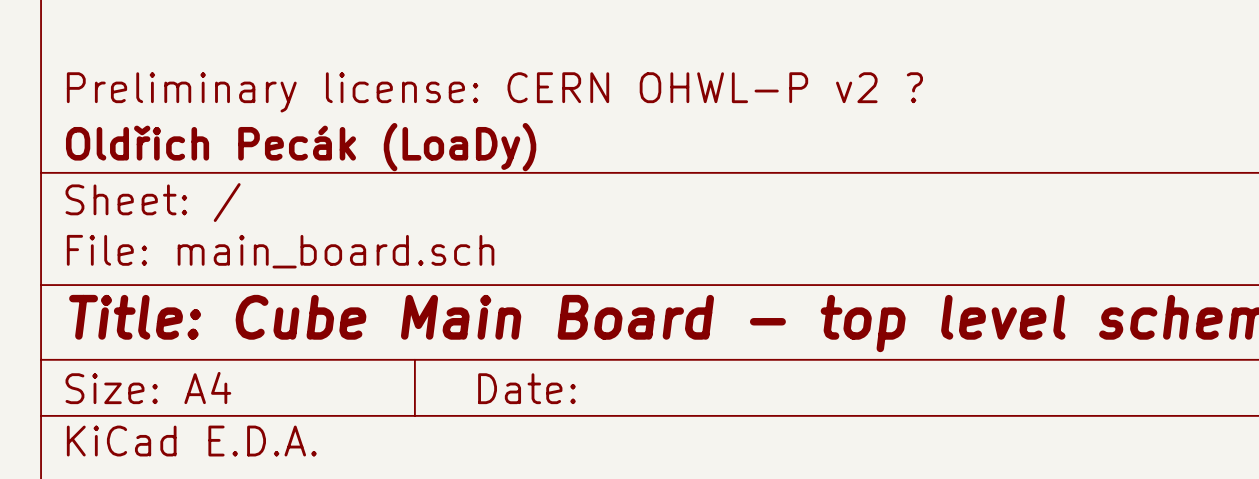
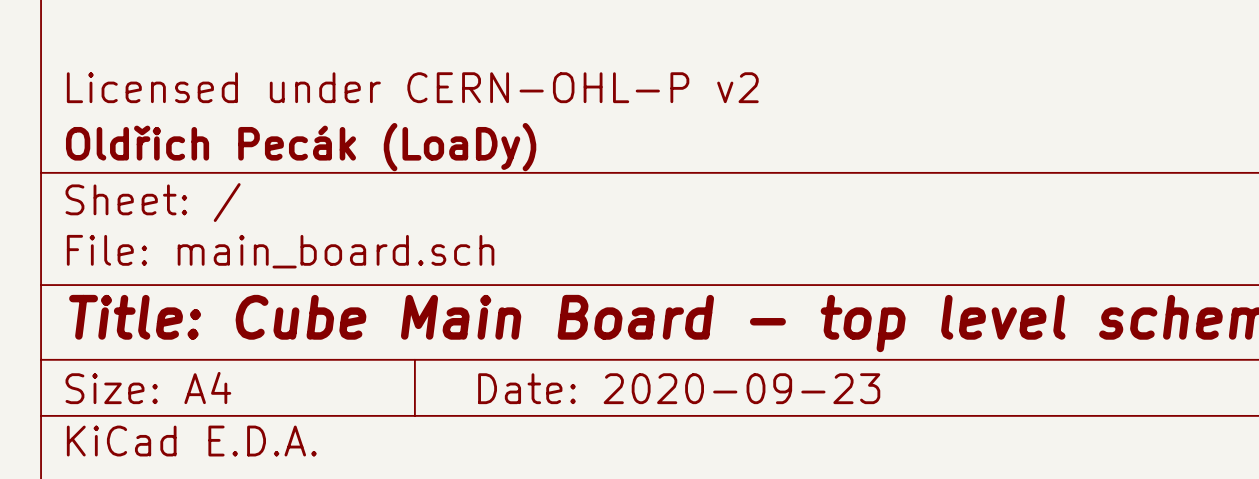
title block: Preliminary license: CERN OHWL-P v2 ? (494, 92) -> Licensed under CERN-OHL-P v2 (412, 87)
title block: Date: (526, 388) -> Date: 2020-09-23 (679, 388)

